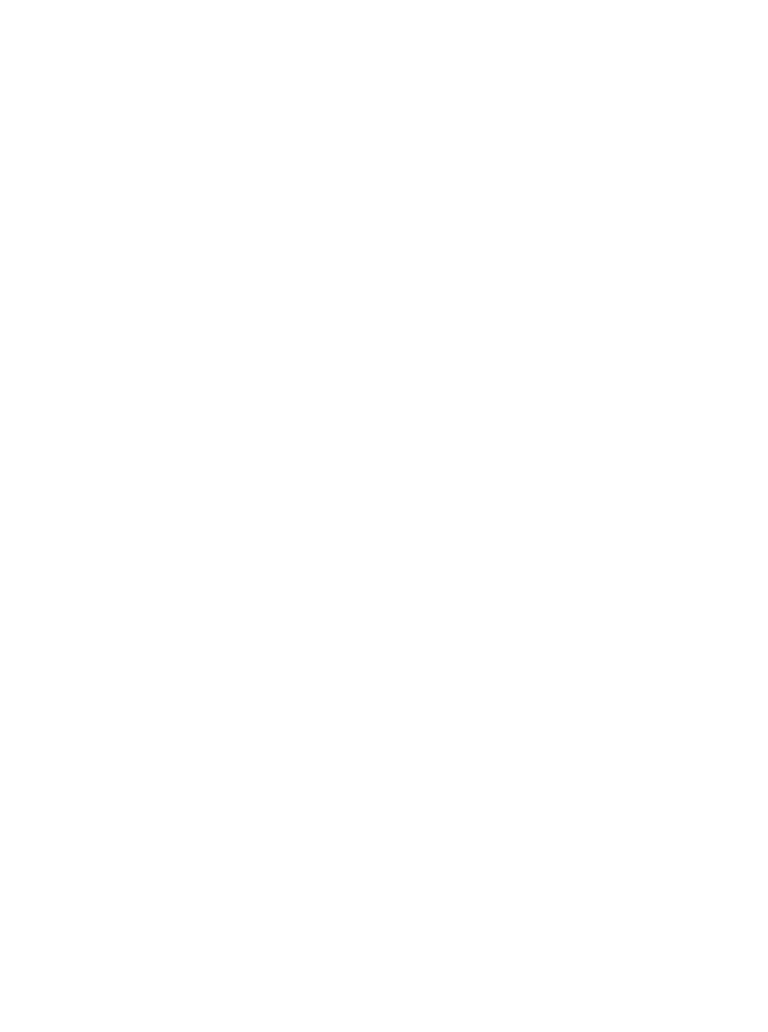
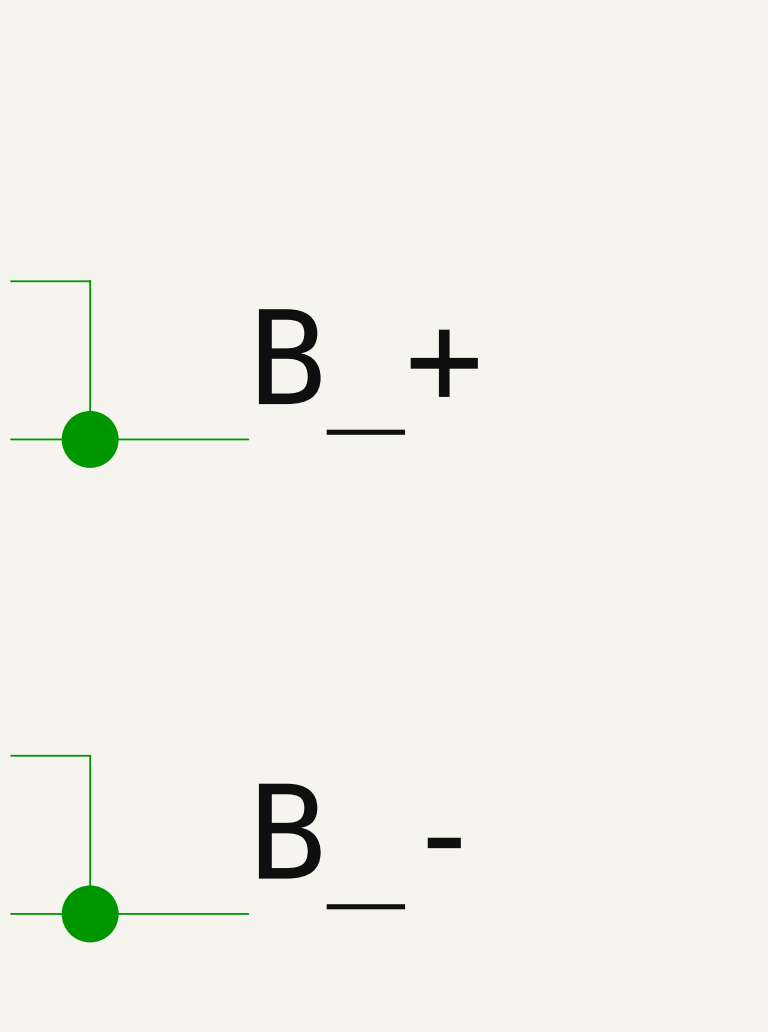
wire: none -> (11, 281) (90, 281) (90, 439)
label: none -> B_+ (368, 371)
wire: none -> (11, 439) (248, 439)
junction: none -> (90, 439)
wire: none -> (11, 755) (90, 755) (90, 913)
label: none -> B_- (359, 846)
wire: none -> (11, 913) (248, 913)
junction: none -> (90, 913)

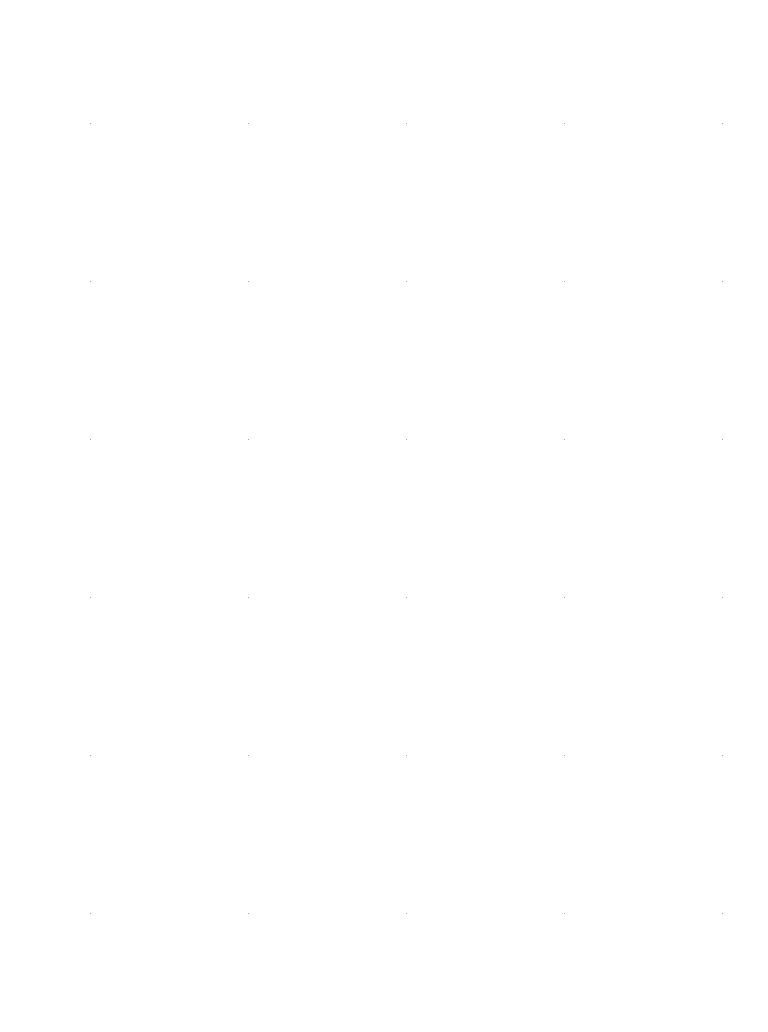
wire: (11, 281) (90, 281) (90, 439) -> none
label: B_+ (368, 371) -> none
wire: (11, 439) (248, 439) -> none
junction: (90, 439) -> none
wire: (11, 755) (90, 755) (90, 913) -> none
label: B_- (359, 846) -> none
wire: (11, 913) (248, 913) -> none
junction: (90, 913) -> none

